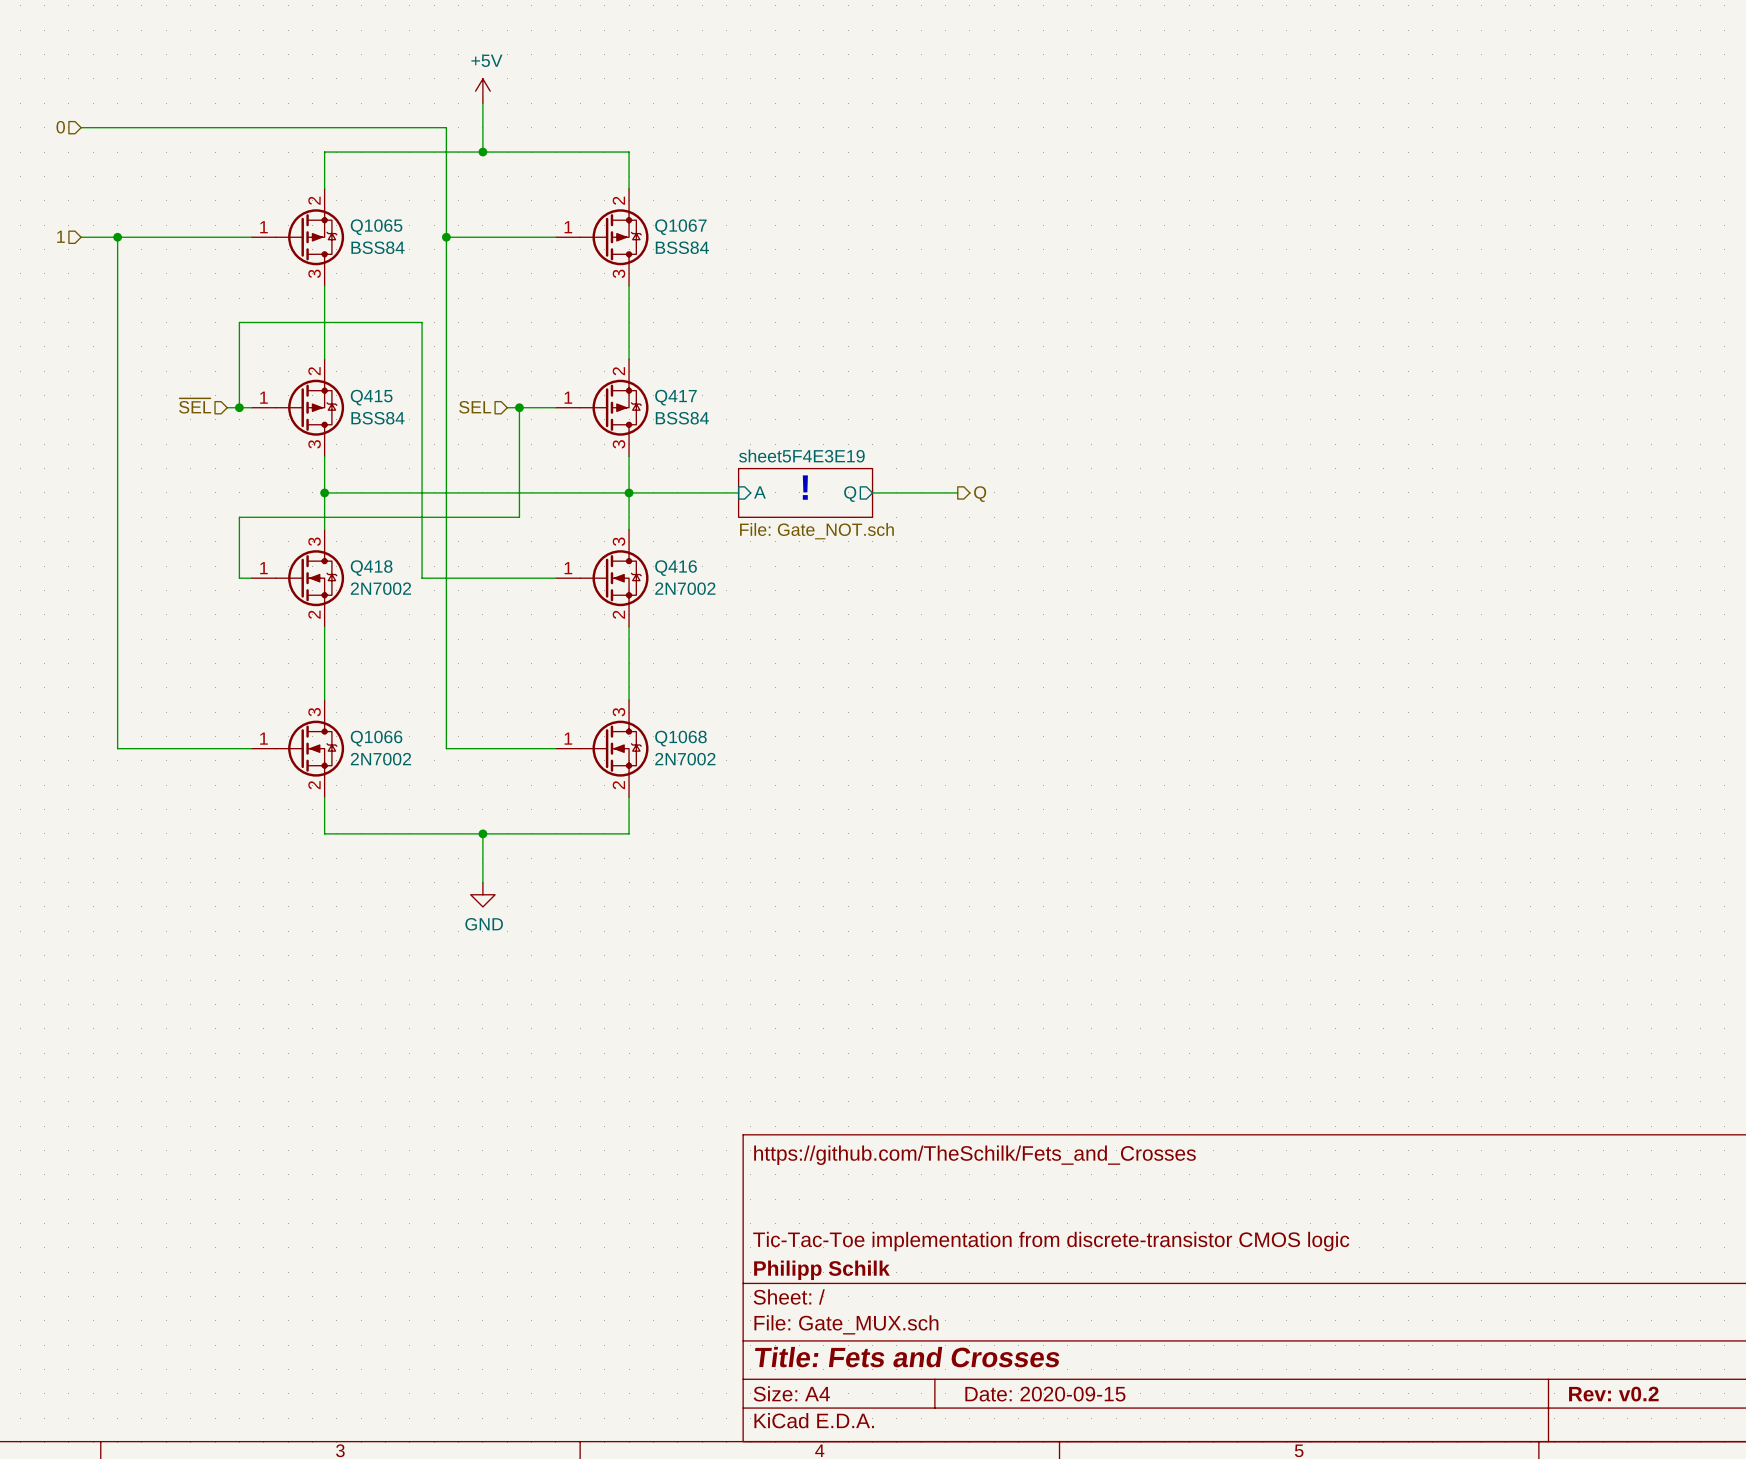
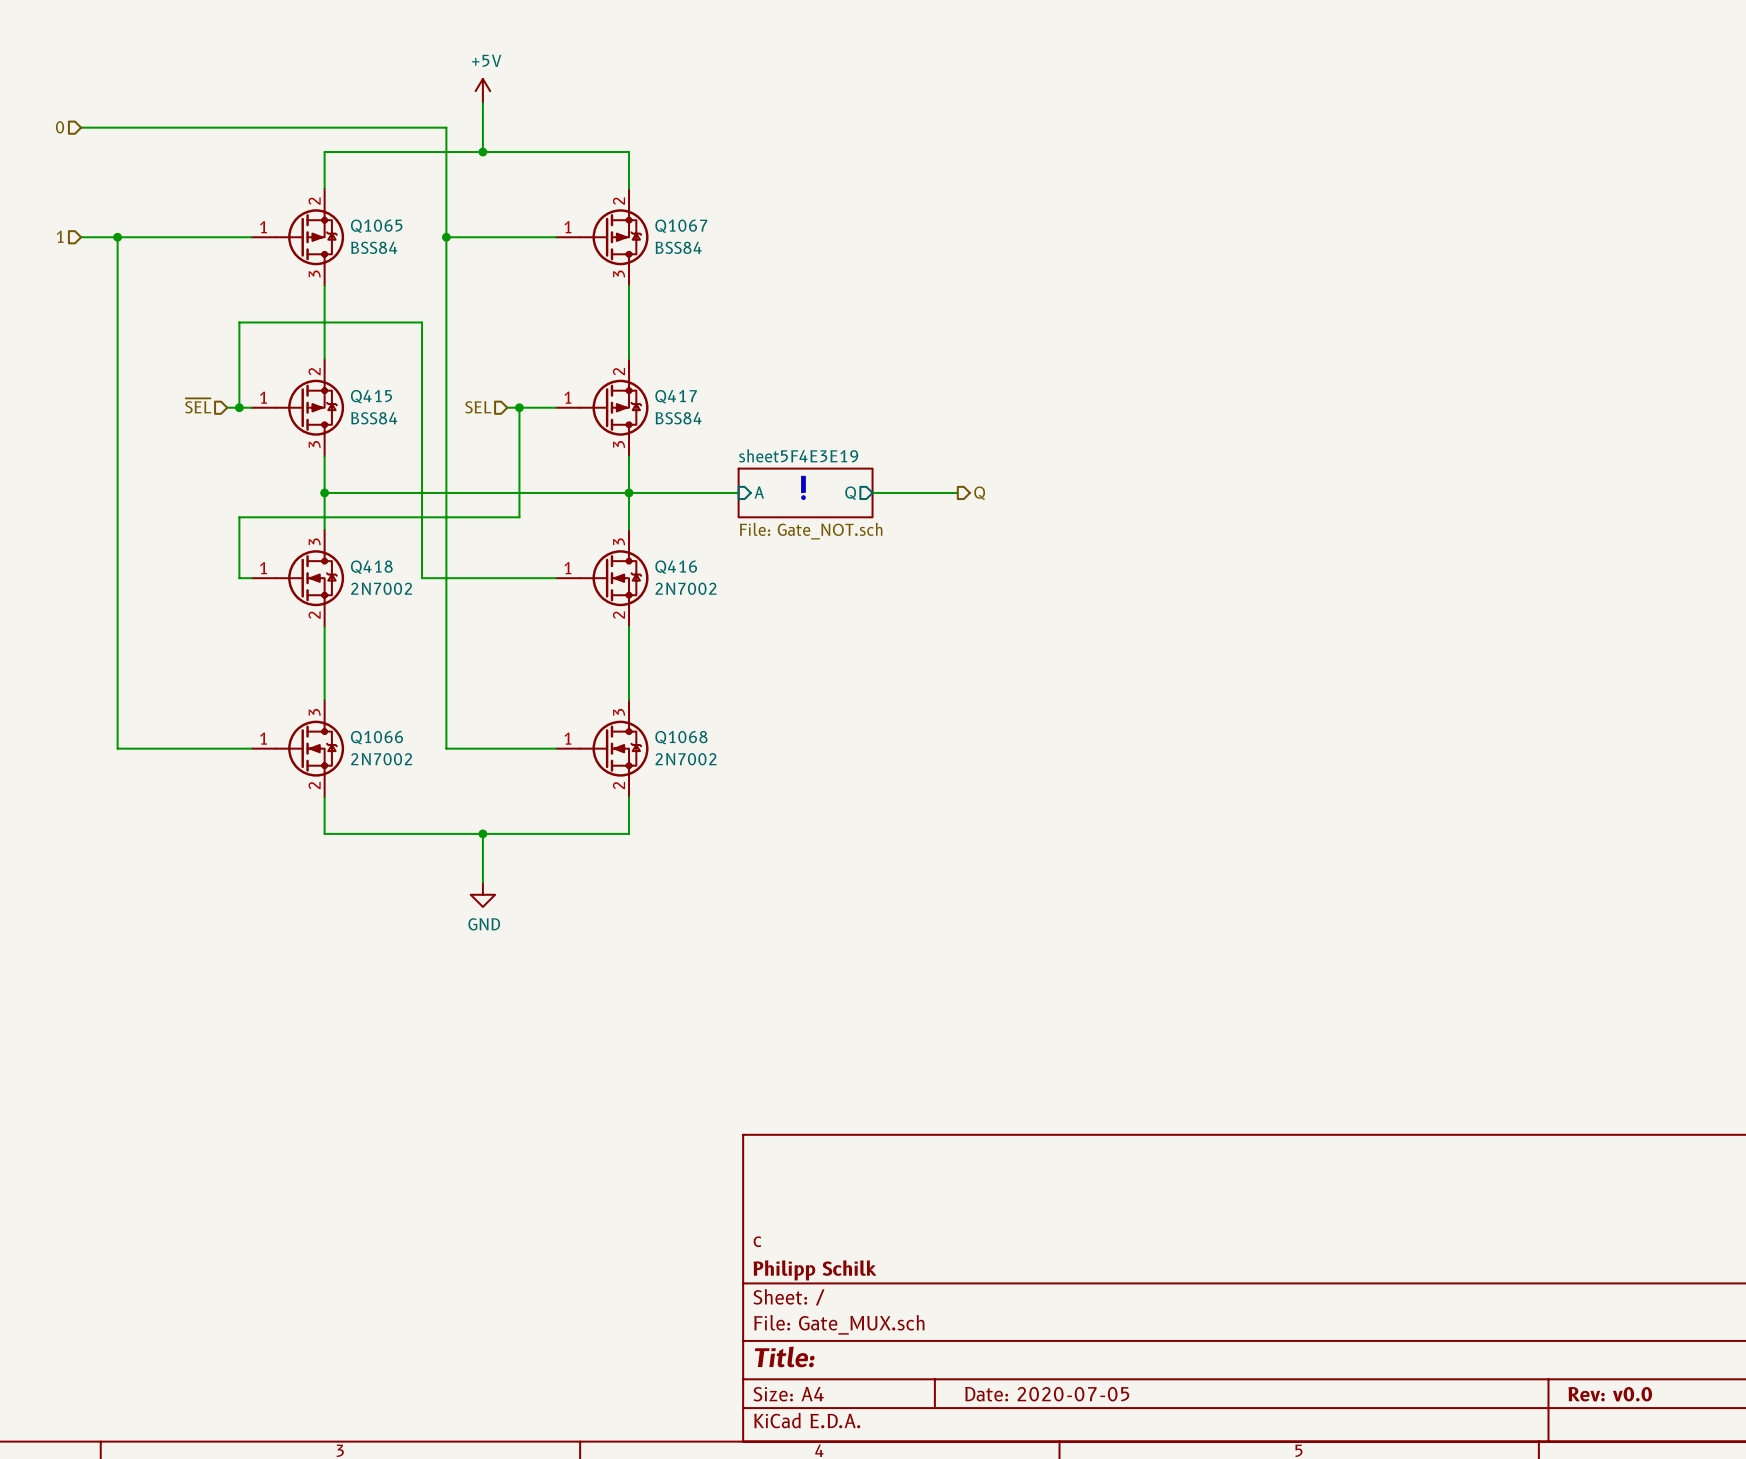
title block: https://github.com/TheSchilk/Fets_and_Crosses (974, 1155) -> none
title block: Tic-Tac-Toe implementation from discrete-transistor CMOS logic (1051, 1241) -> c (757, 1241)
title block: Title: Fets and Crosses (907, 1357) -> Title: (784, 1356)
title block: Date: 2020-09-15 (1045, 1394) -> Date: 2020-07-05 (1047, 1394)
title block: Rev: v0.2 (1613, 1394) -> Rev: v0.0 (1610, 1394)

